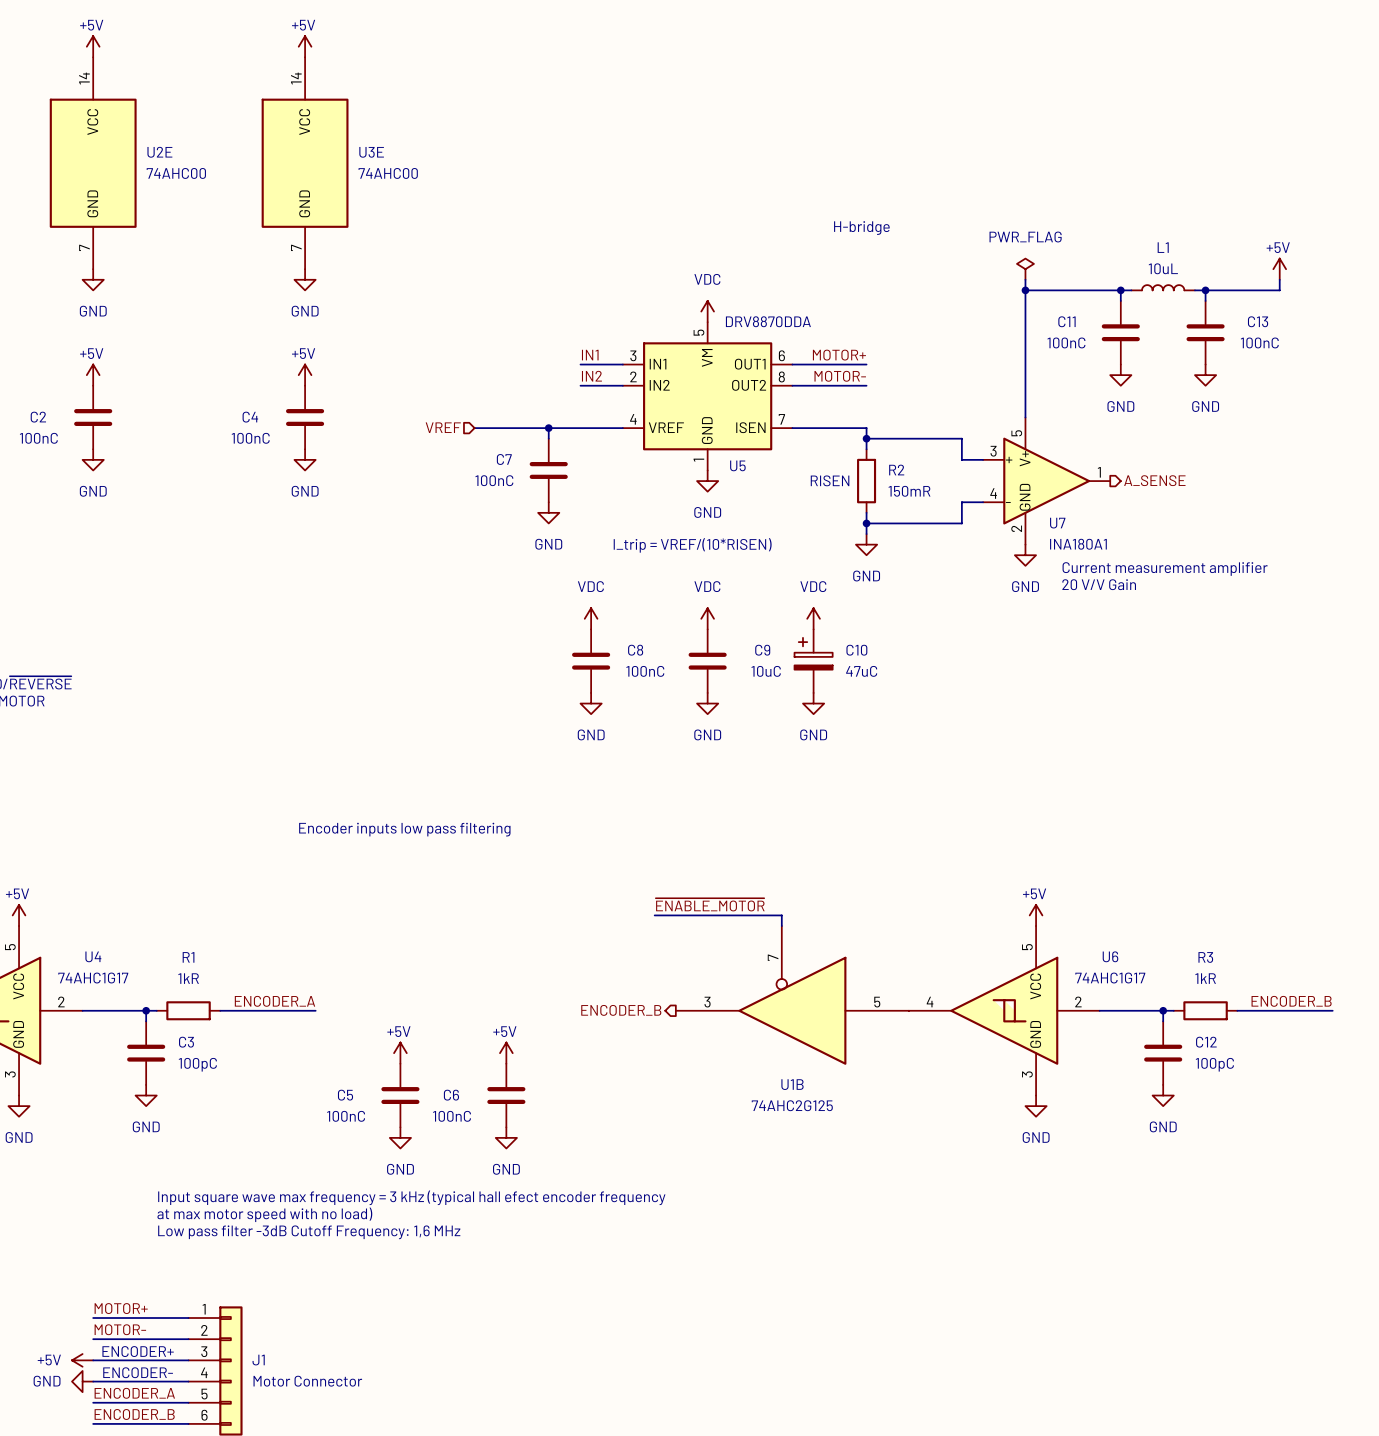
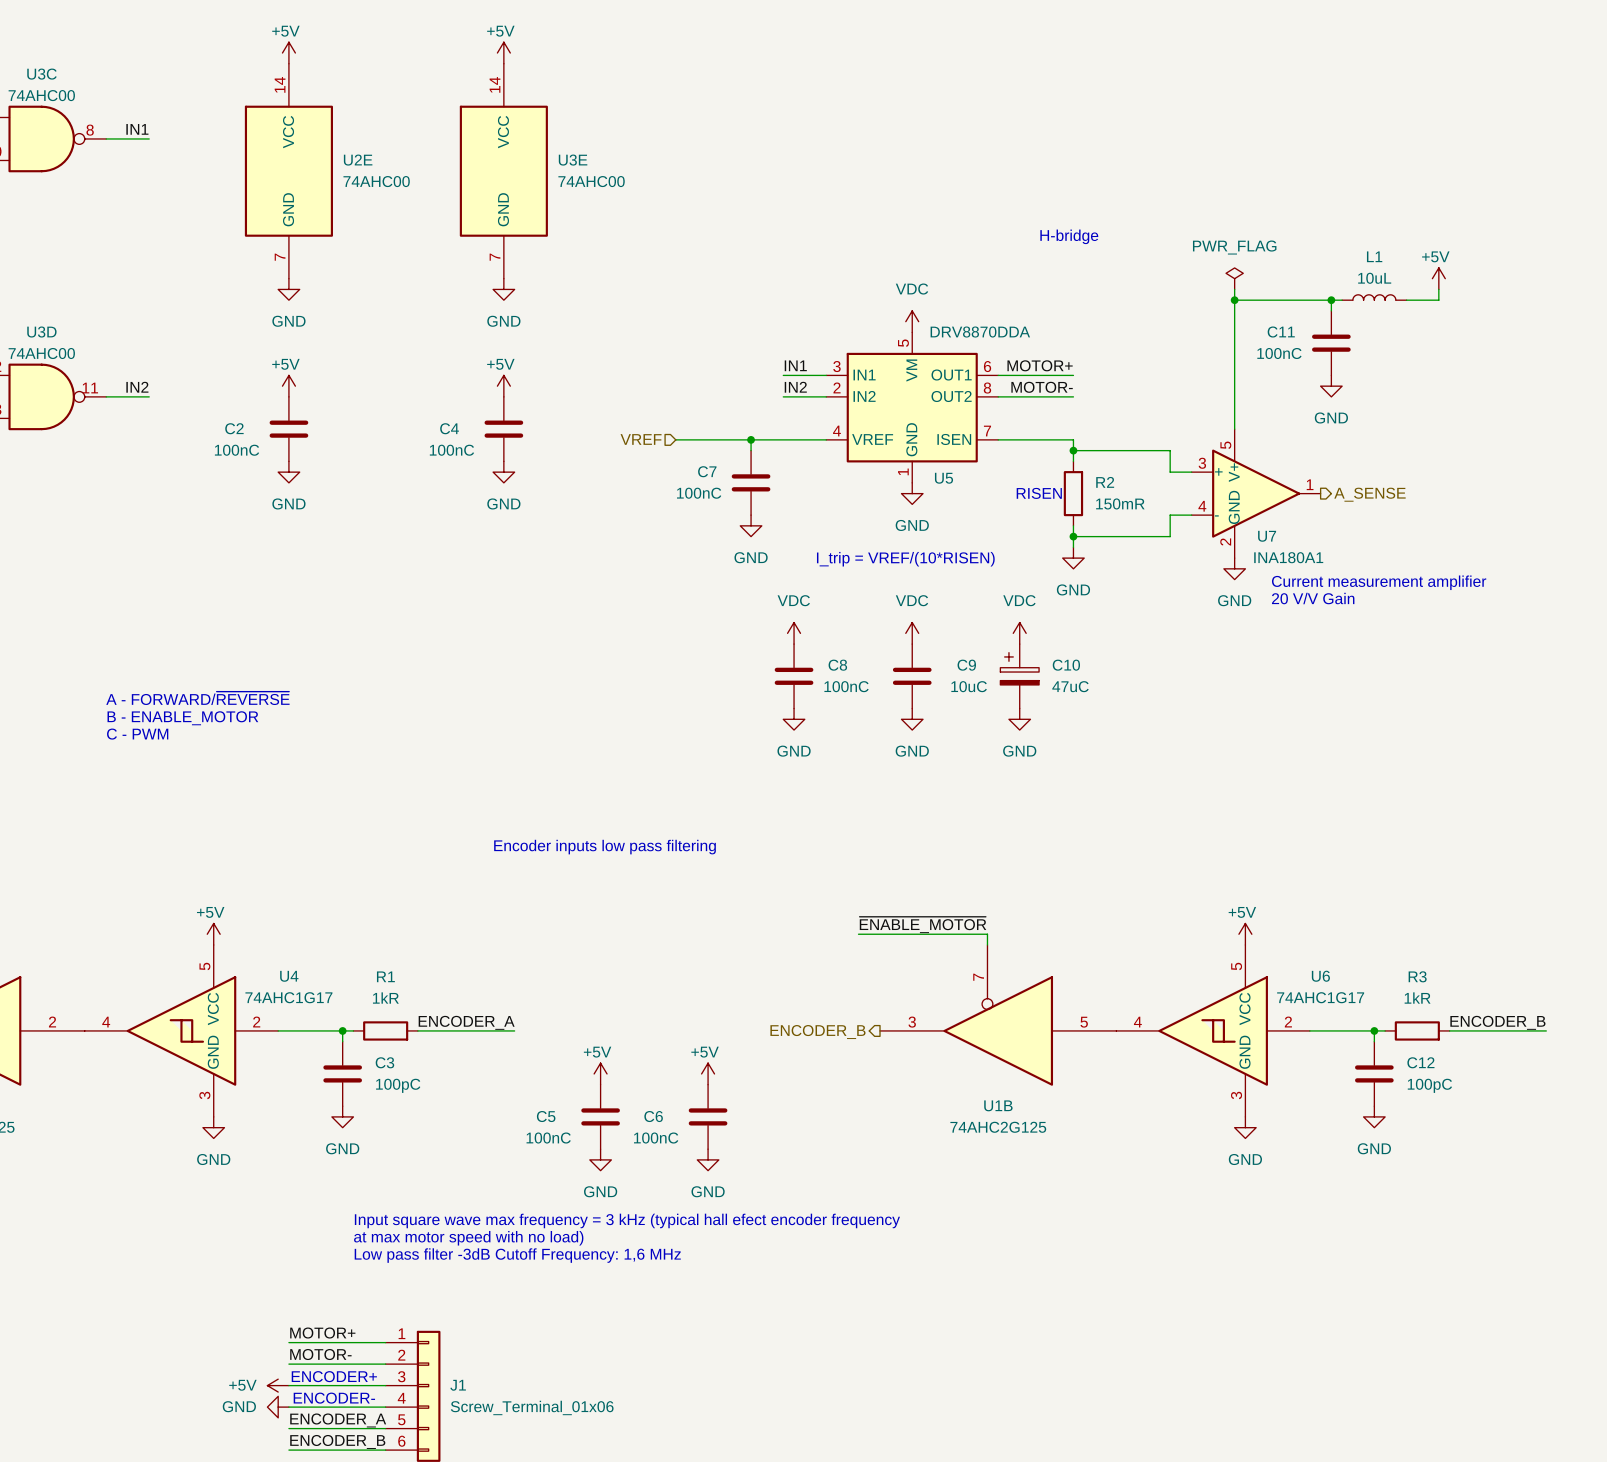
power symbol position: +5V (1279, 269) -> +5V (1438, 278)
wire: (1279, 279) (1279, 290) (1226, 290) -> (1438, 289) (1438, 300)
wire: (1205, 290) (1205, 300) -> none
junction: (1205, 290) -> none
C13: 100nC (1205, 332) -> none
power symbol: GND (1205, 375) -> none
J1 value: Motor Connector (307, 1381) -> Screw_Terminal_01x06 (532, 1407)

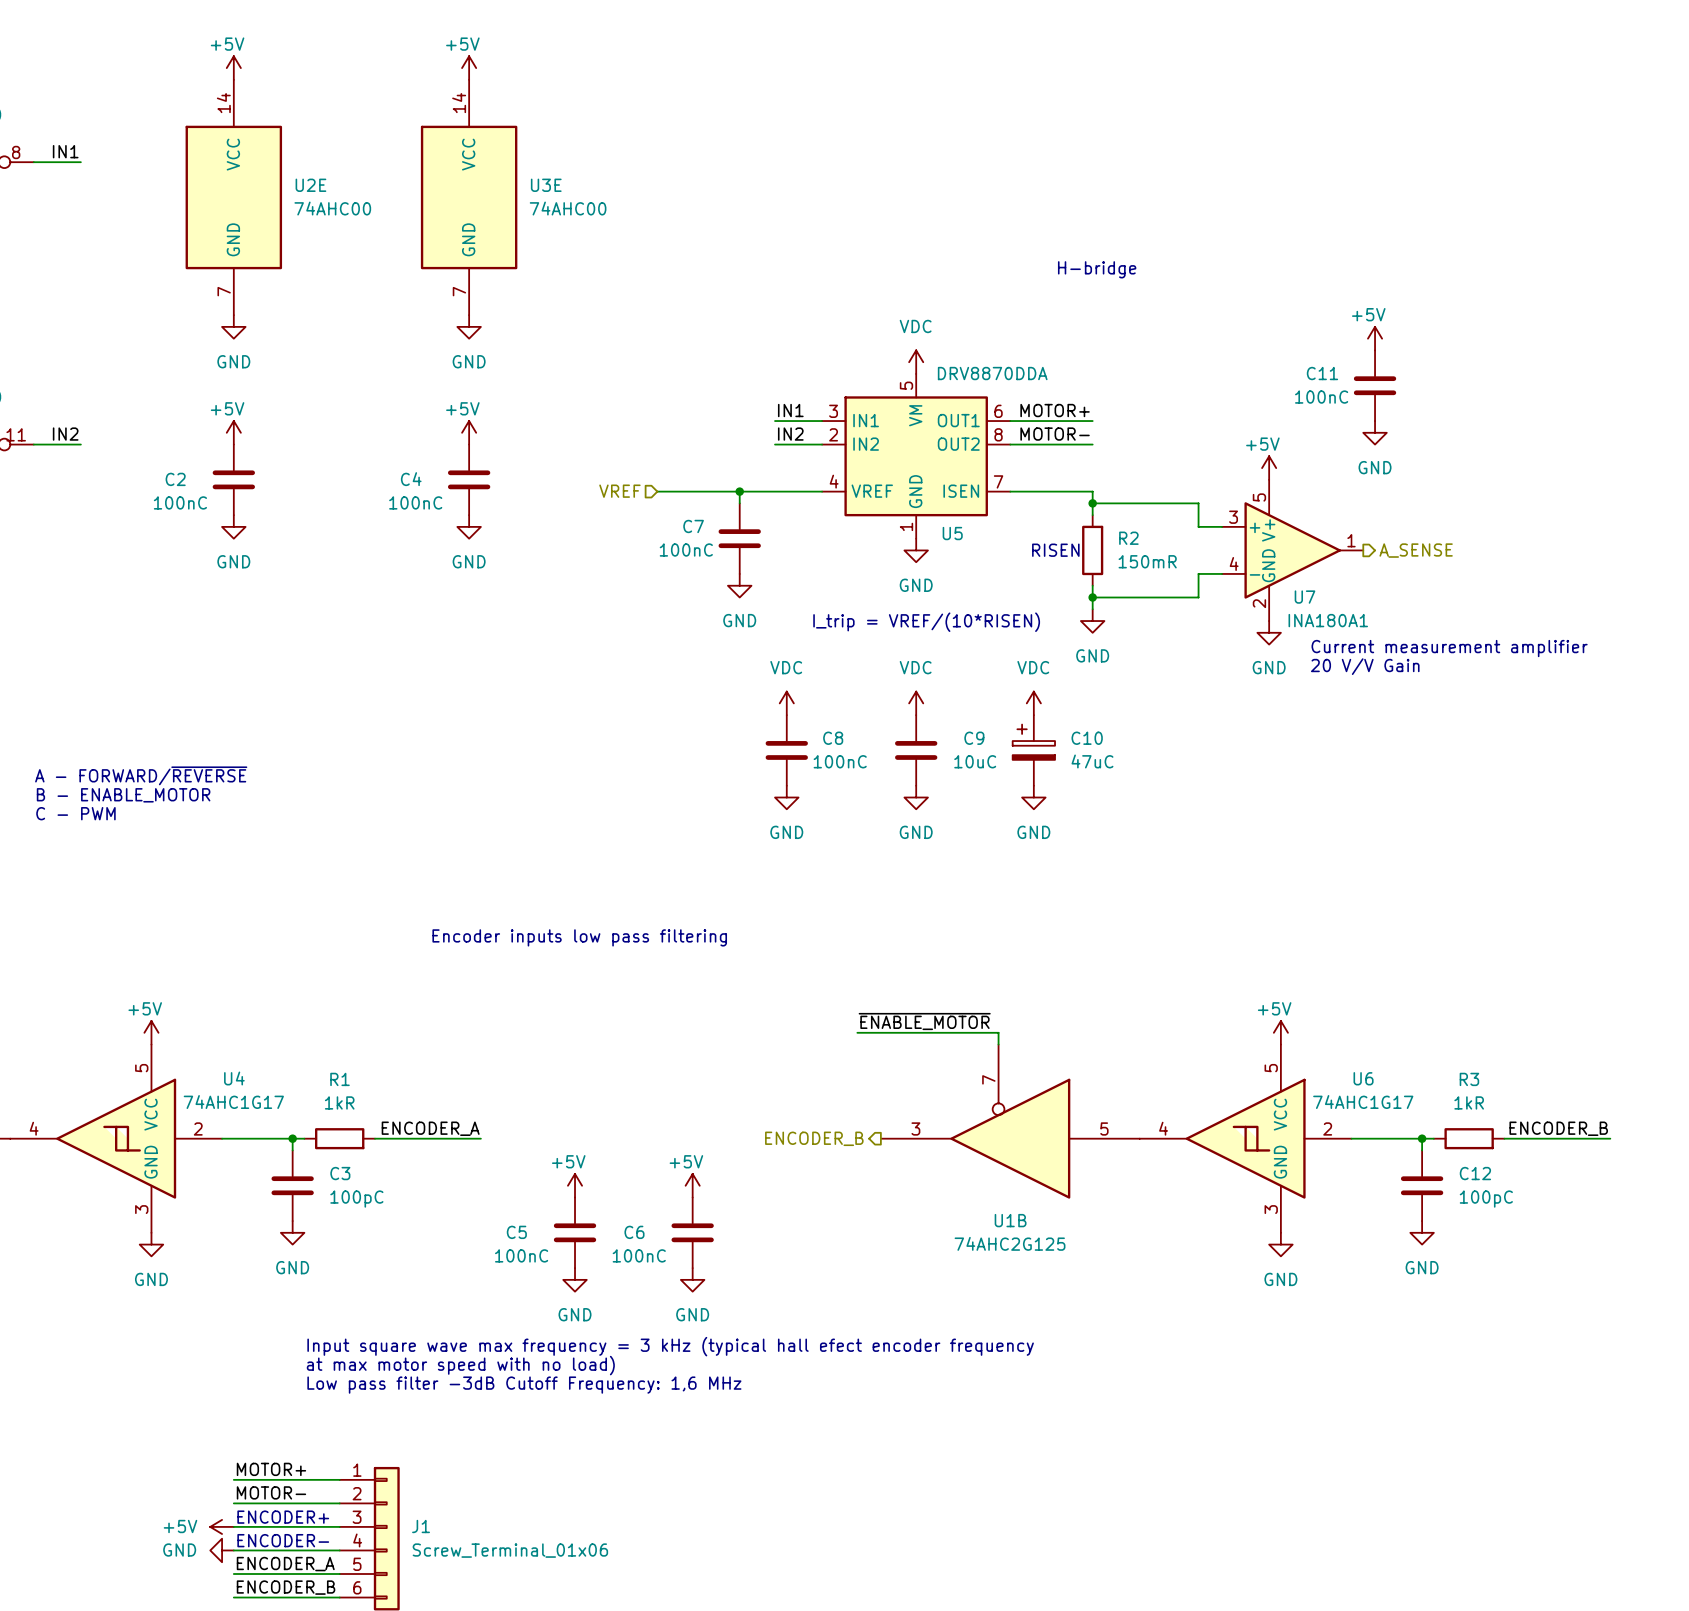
power symbol: PWR_FLAG (1234, 278) -> none
power symbol position: +5V (1438, 278) -> +5V (1375, 338)
wire: (1234, 289) (1234, 429) -> none
wire: (1438, 289) (1438, 300) (1406, 300) -> none
L1: 10uL (1374, 297) -> none
wire: (1234, 300) (1342, 300) -> none
junction: (1234, 300) -> none
junction: (1331, 300) -> none
power symbol: none -> +5V (1269, 468)

